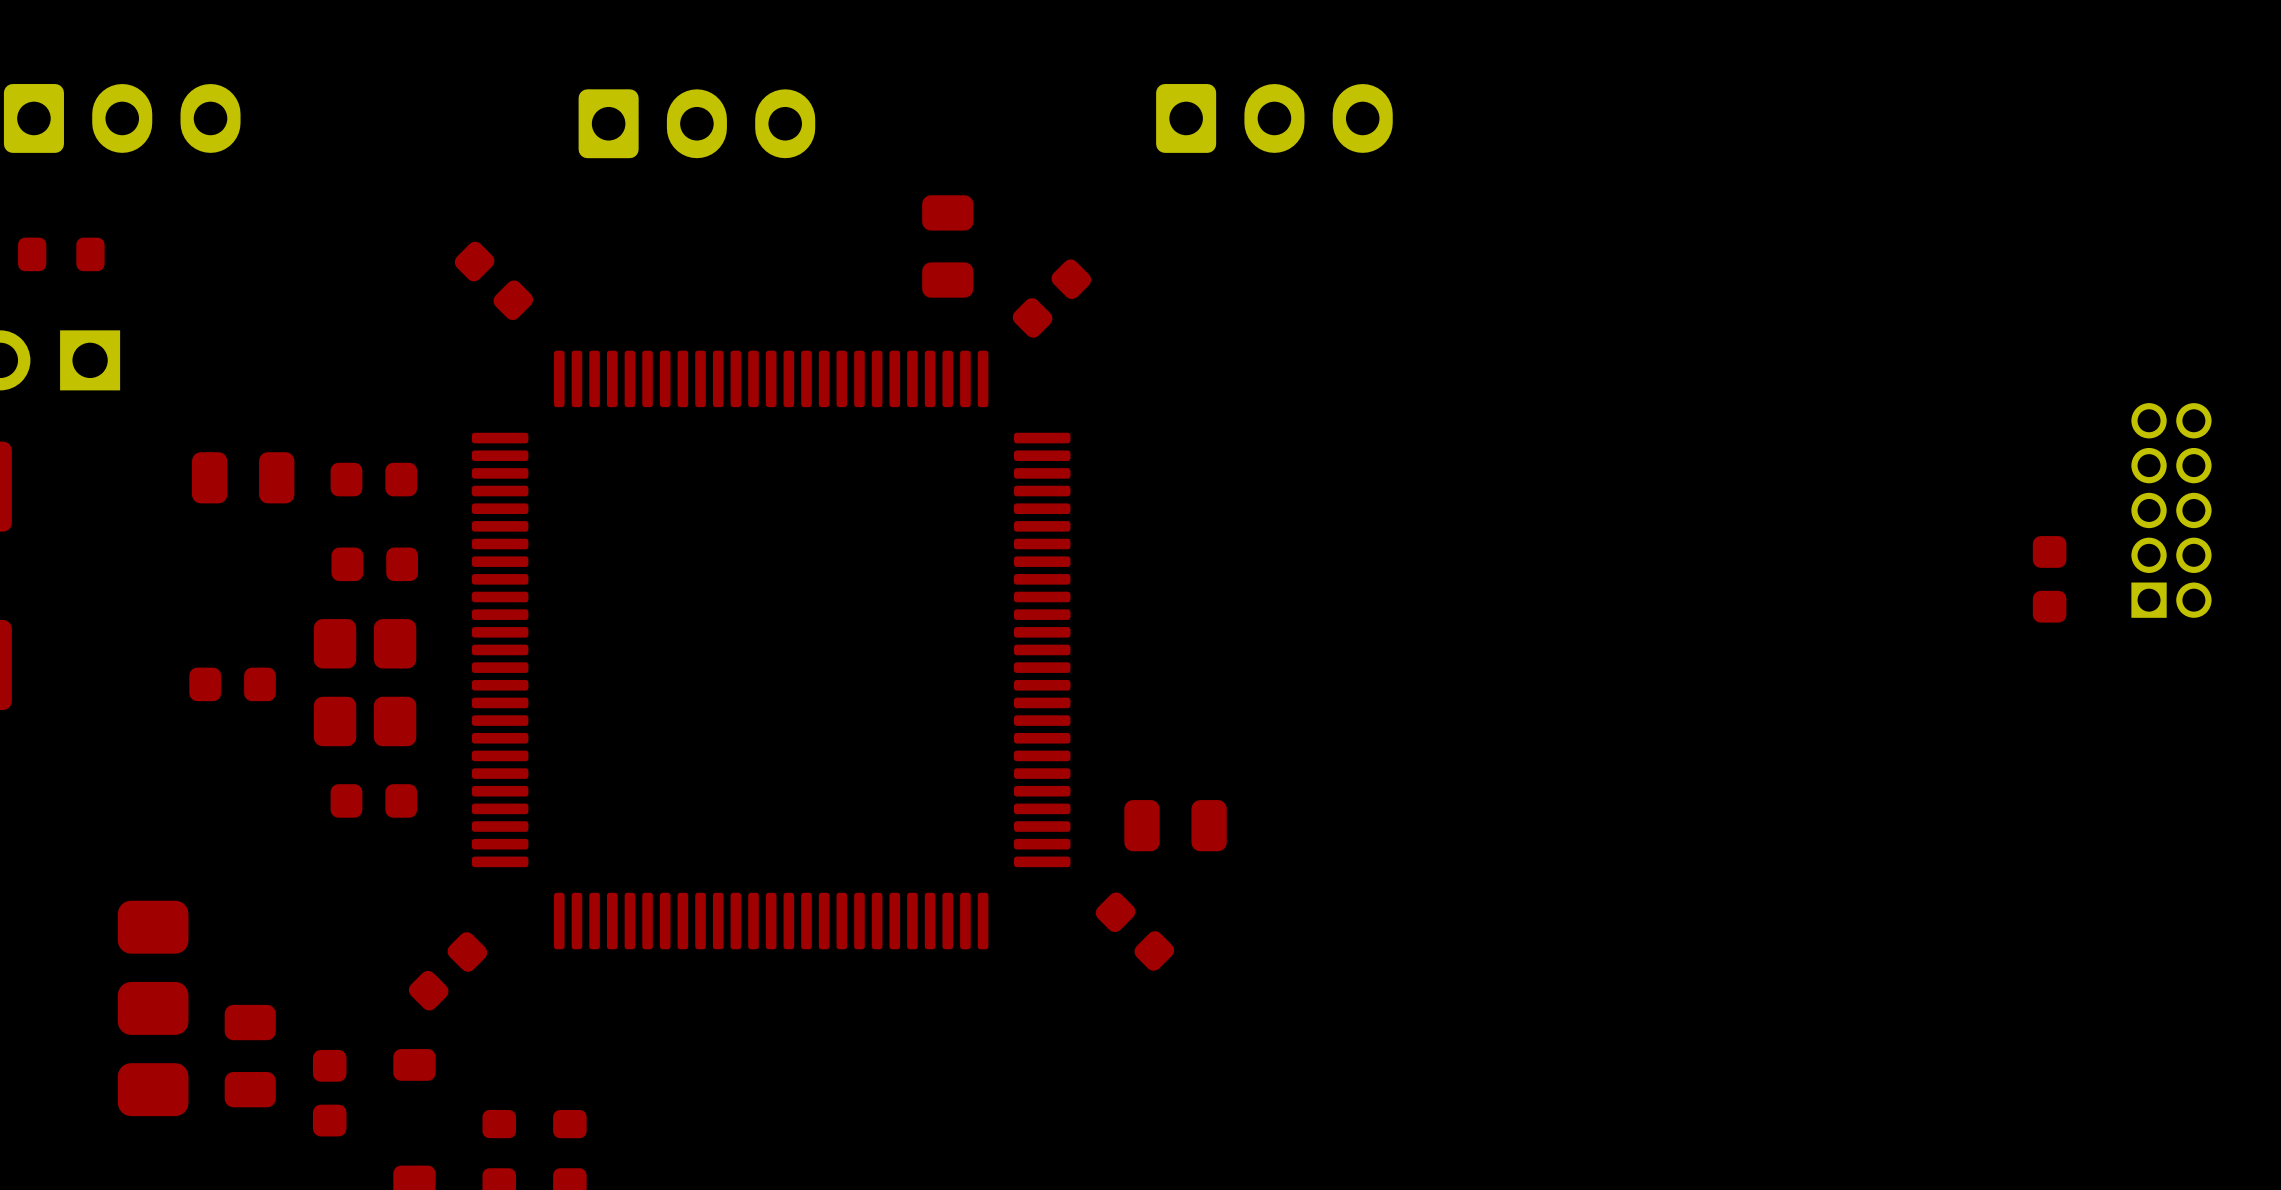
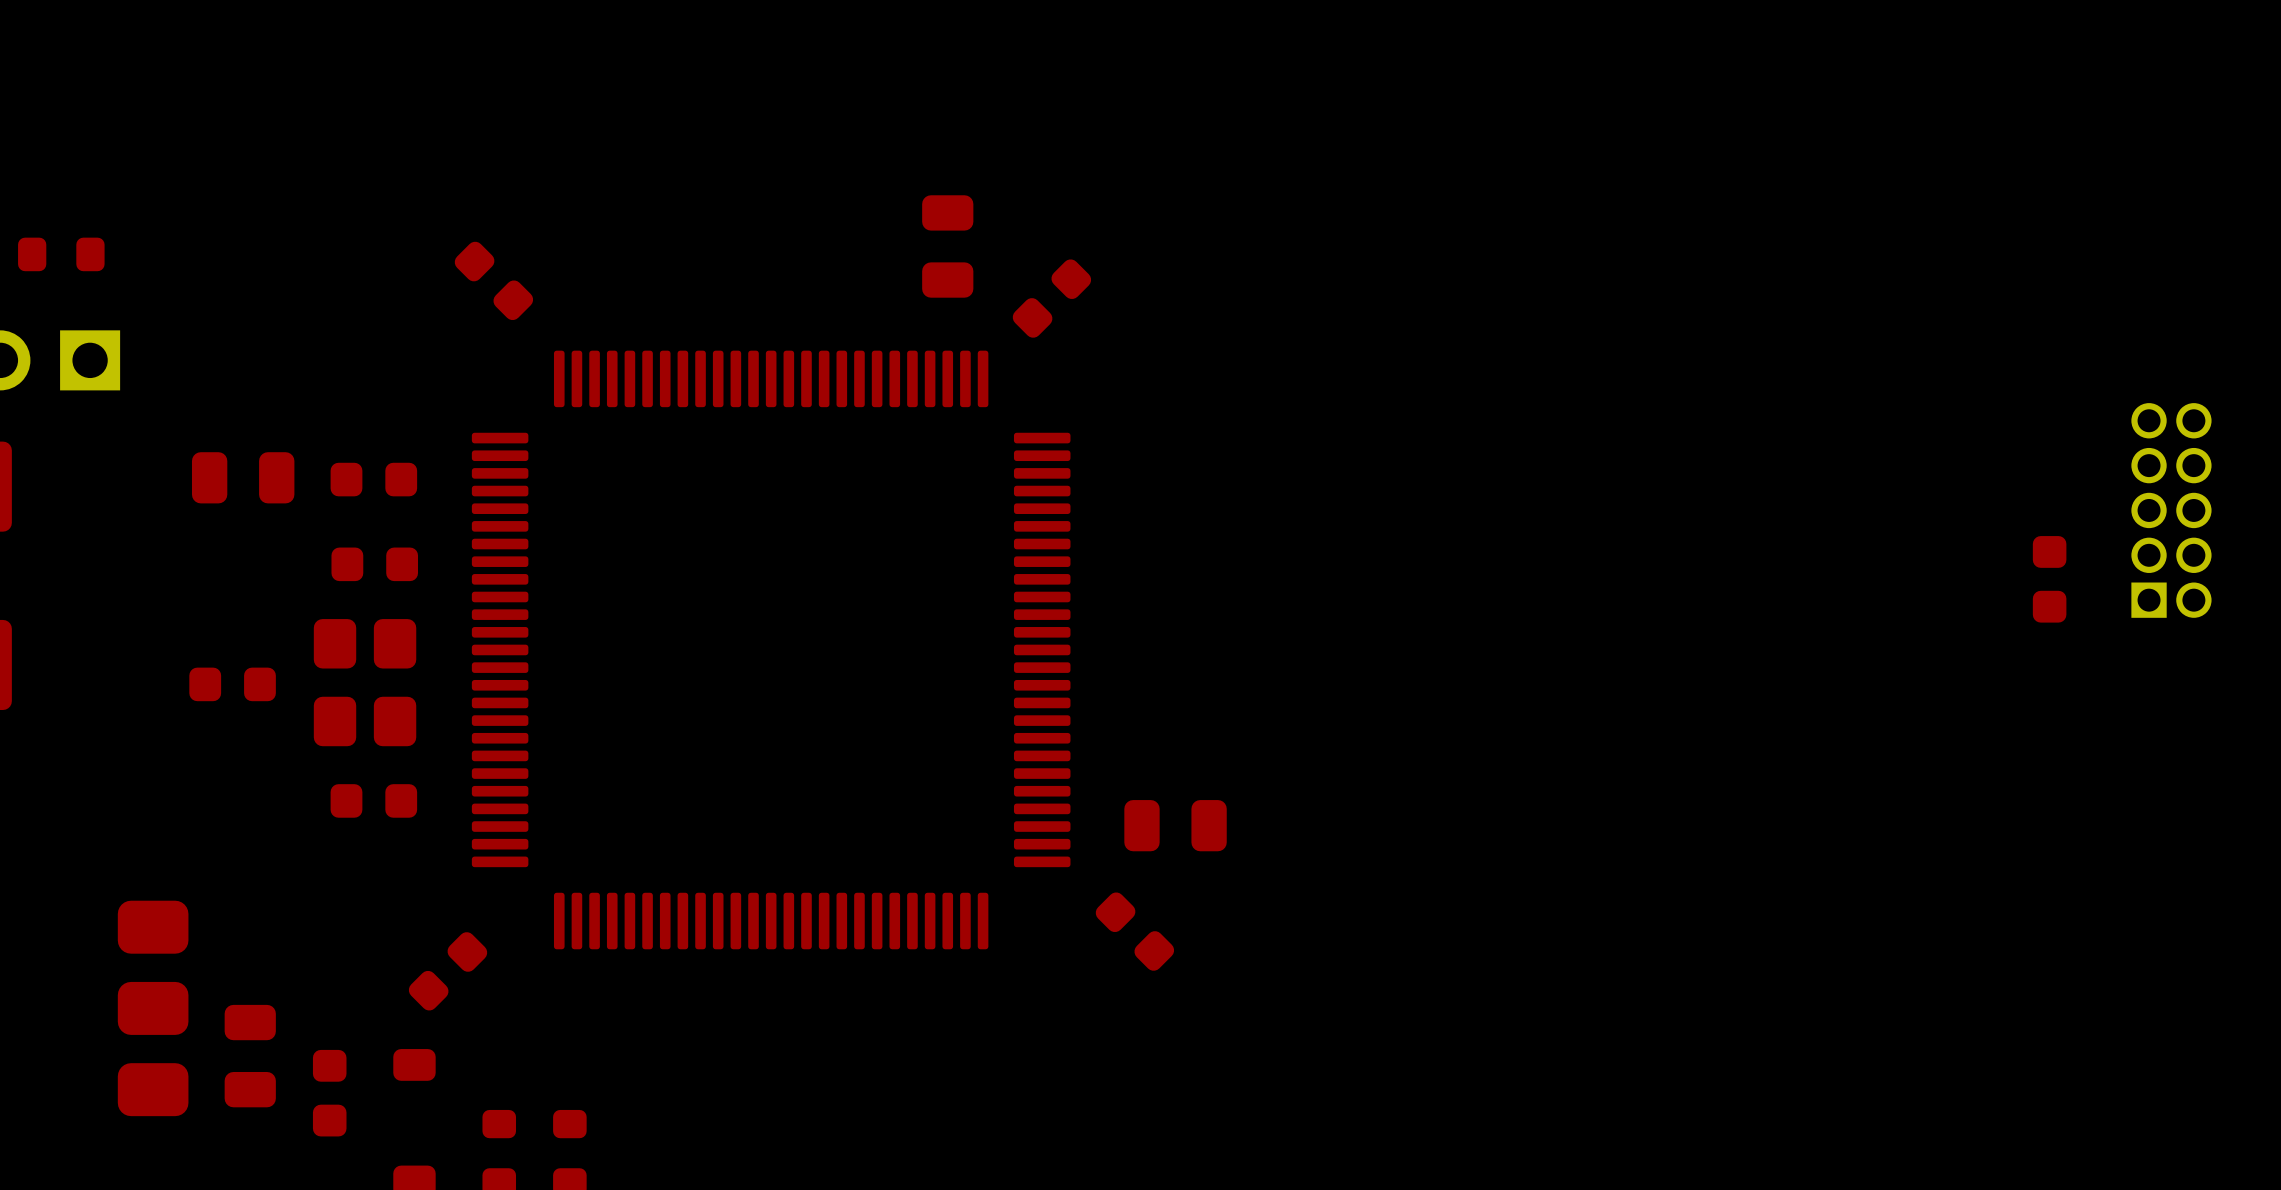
part: (122, 118) -> none
part: (1274, 118) -> none
part: (696, 123) -> none

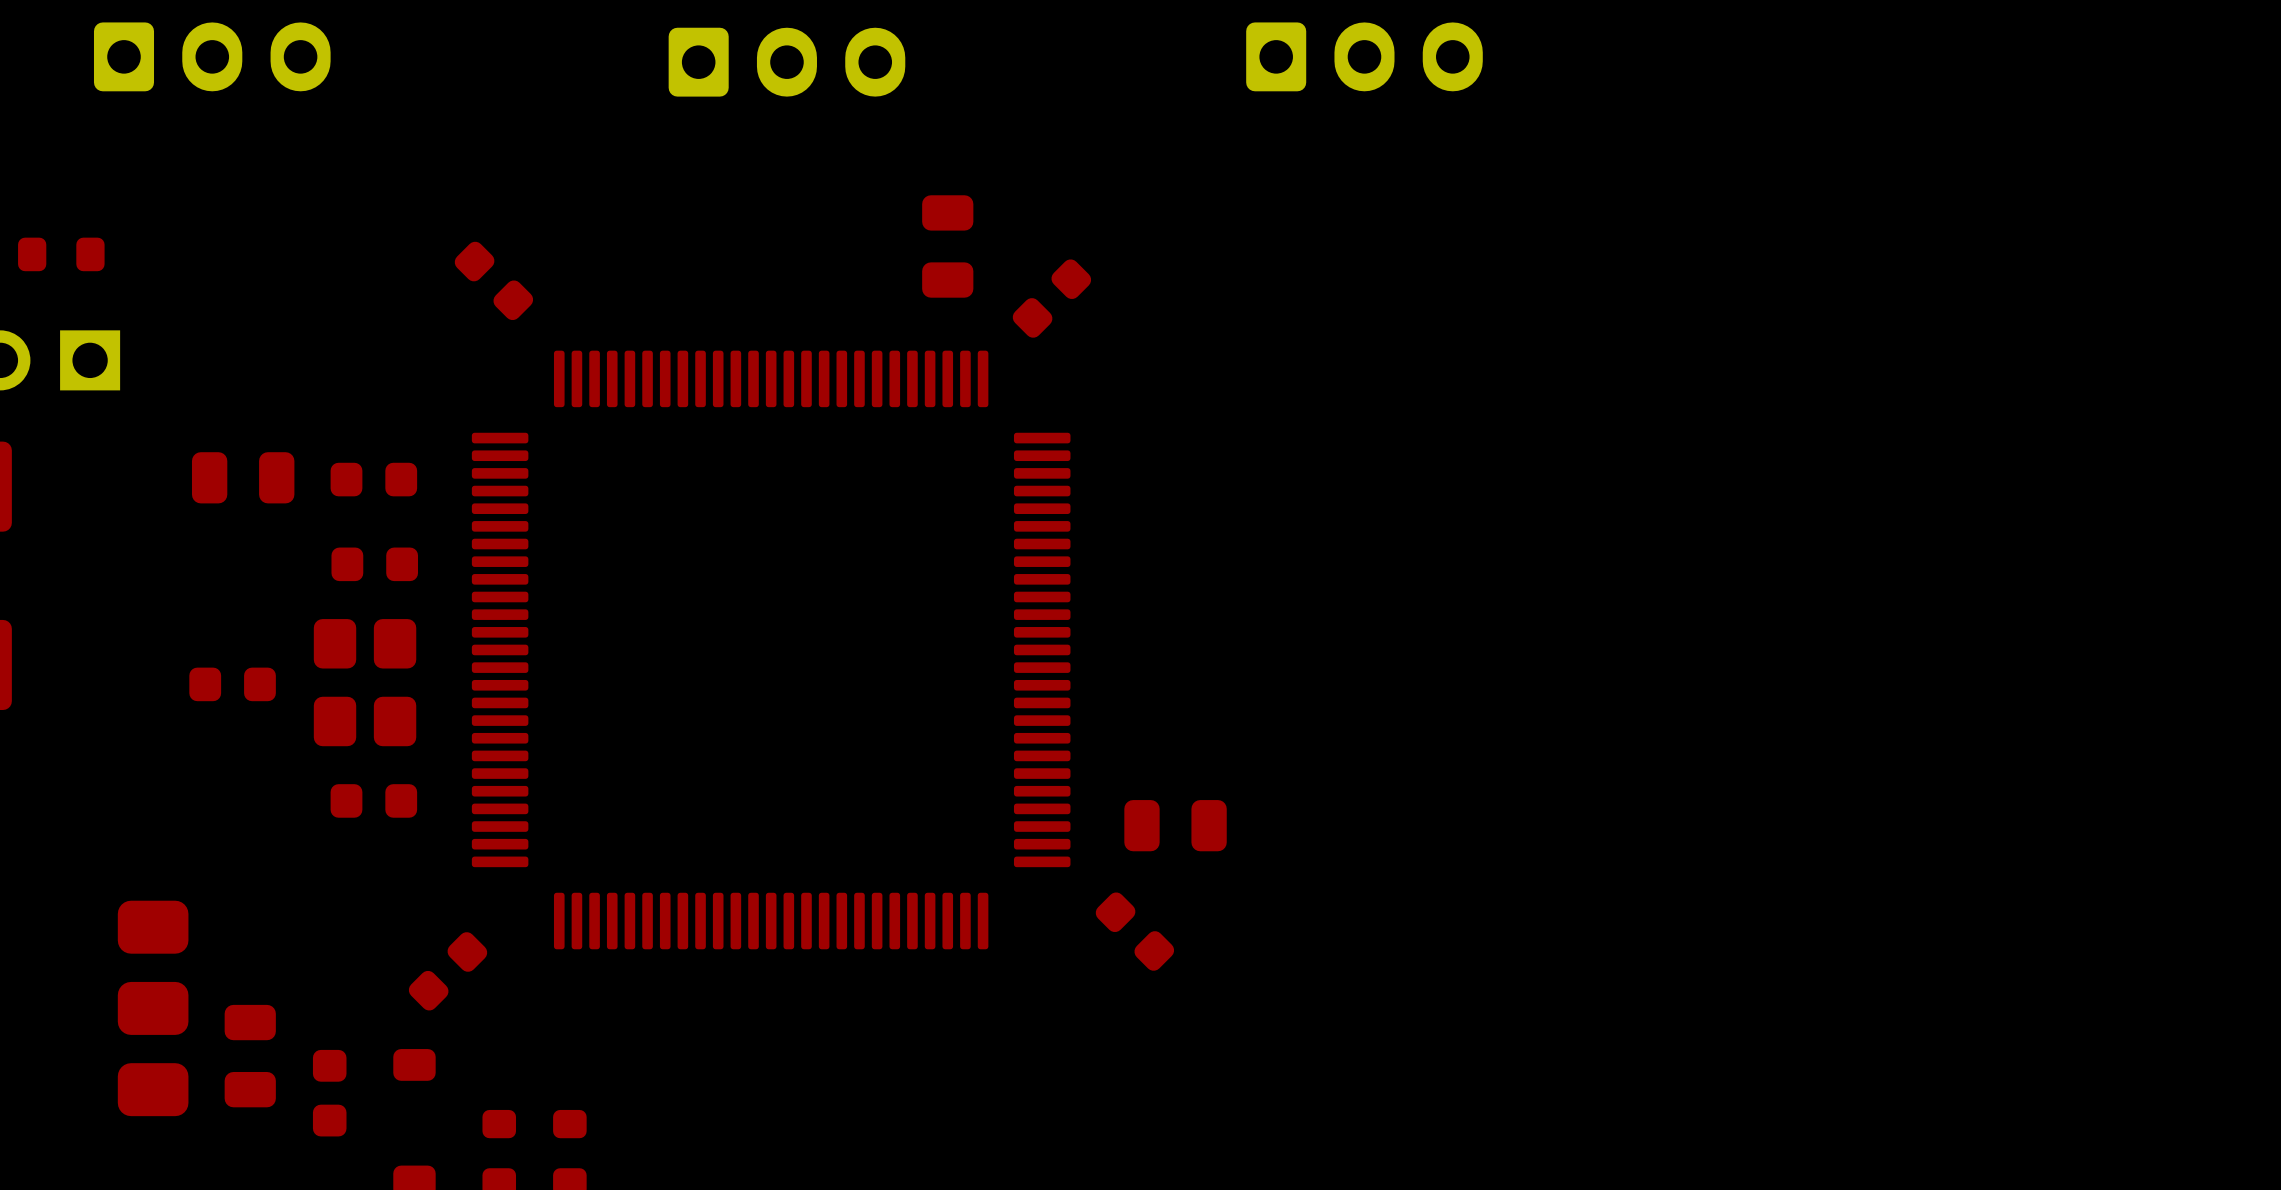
part: none -> (212, 56)
part: none -> (1364, 56)
part: none -> (786, 62)
part: (2171, 510) -> none
part: (2049, 579) -> none

